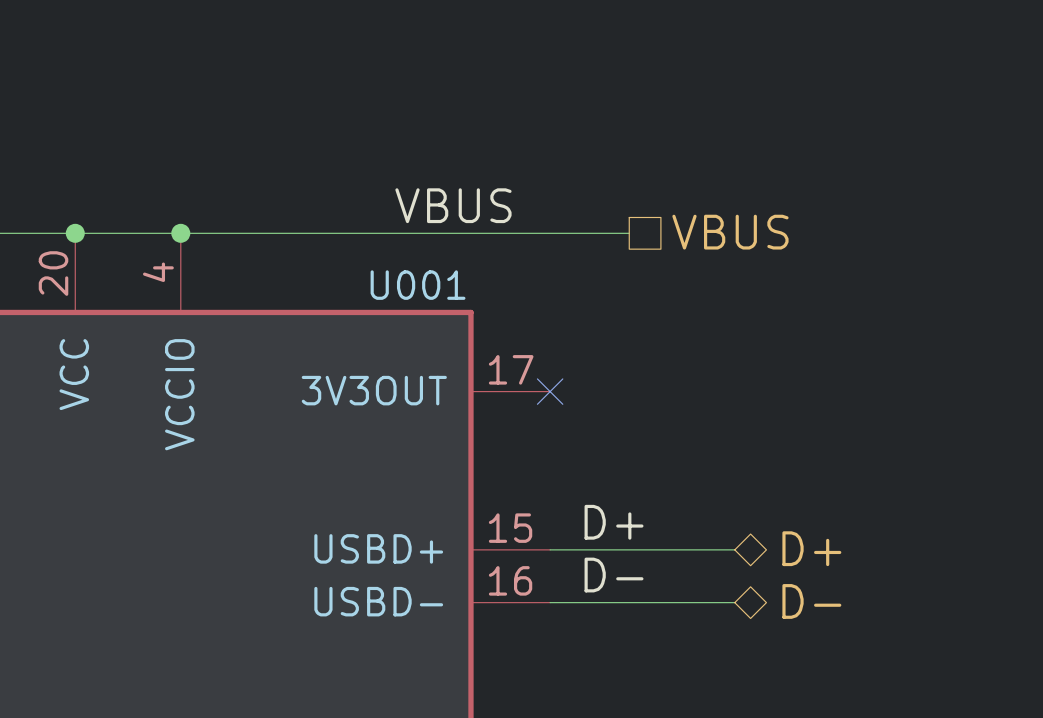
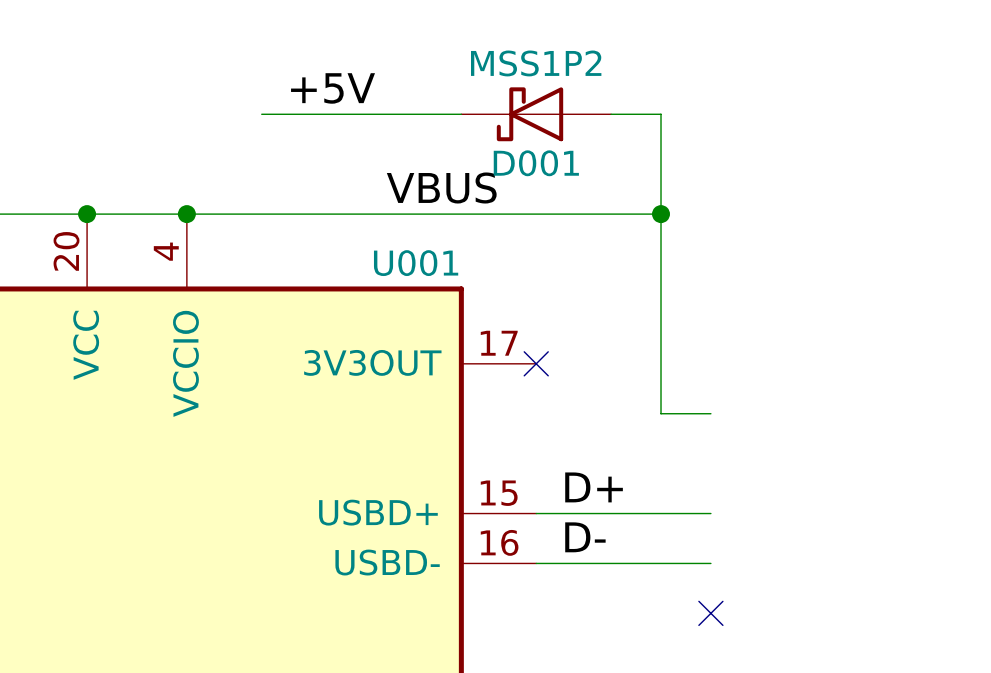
label: none -> +5V (333, 88)
wire: none -> (261, 114) (461, 114)
D001: none -> MSS1P2 (536, 114)
wire: none -> (611, 114) (661, 114) (661, 413) (710, 413)
hierarchical label: VBUS (730, 232) -> none
wire: none -> (611, 214) (661, 214)
junction: none -> (661, 214)
hierarchical label: D+ (811, 548) -> none
hierarchical label: D- (811, 601) -> none
no-connect mark: none -> (710, 613)

